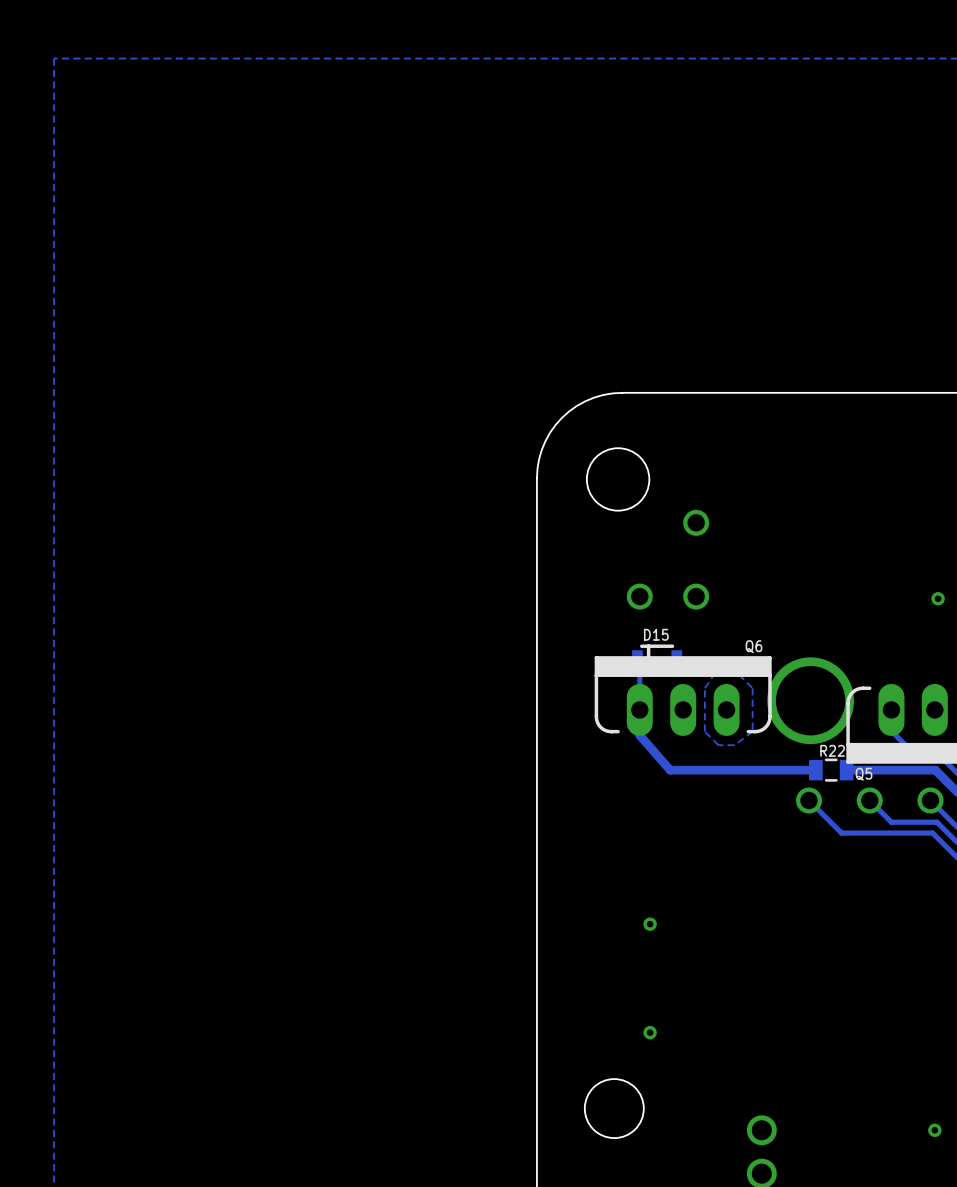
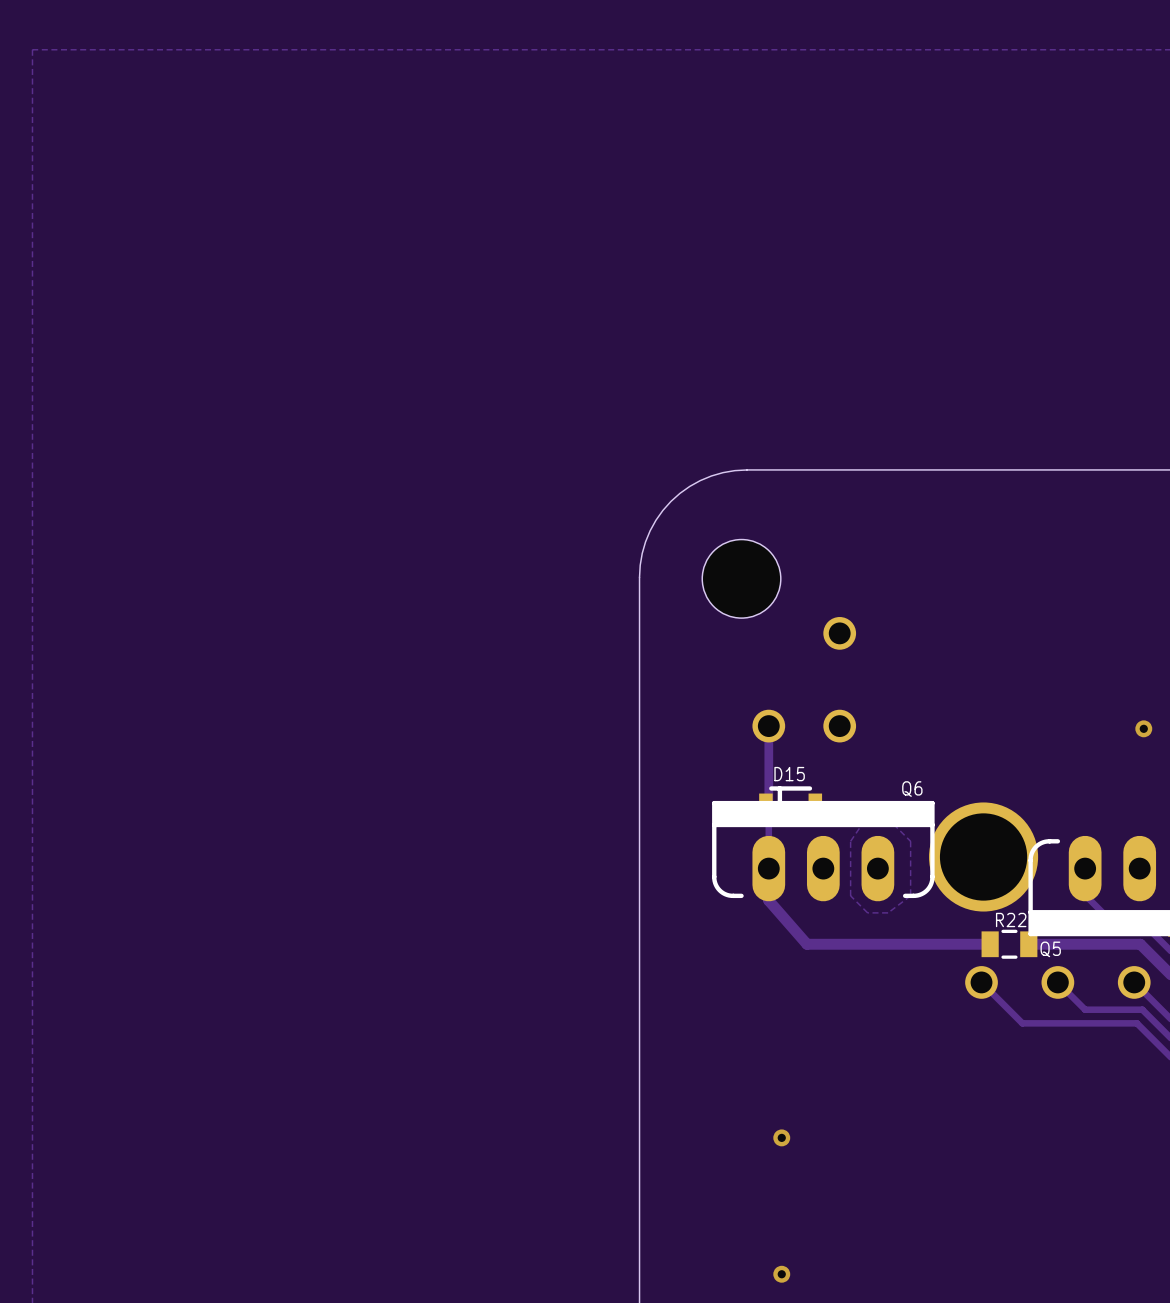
track: none -> (768, 726) (768, 799) (765, 802)

